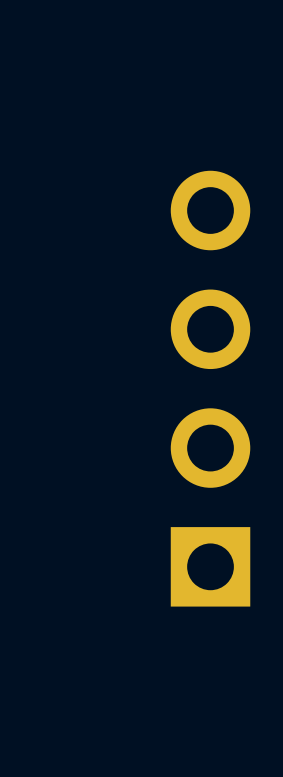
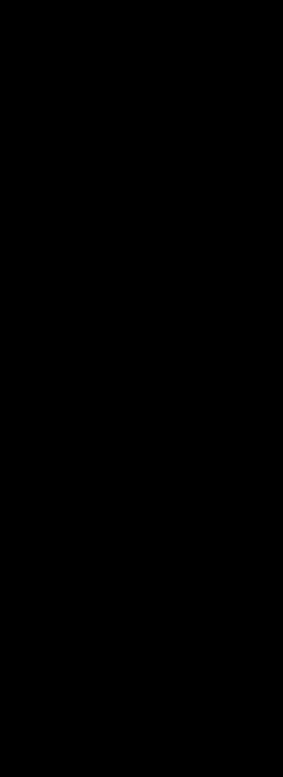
part: (210, 388) -> none

